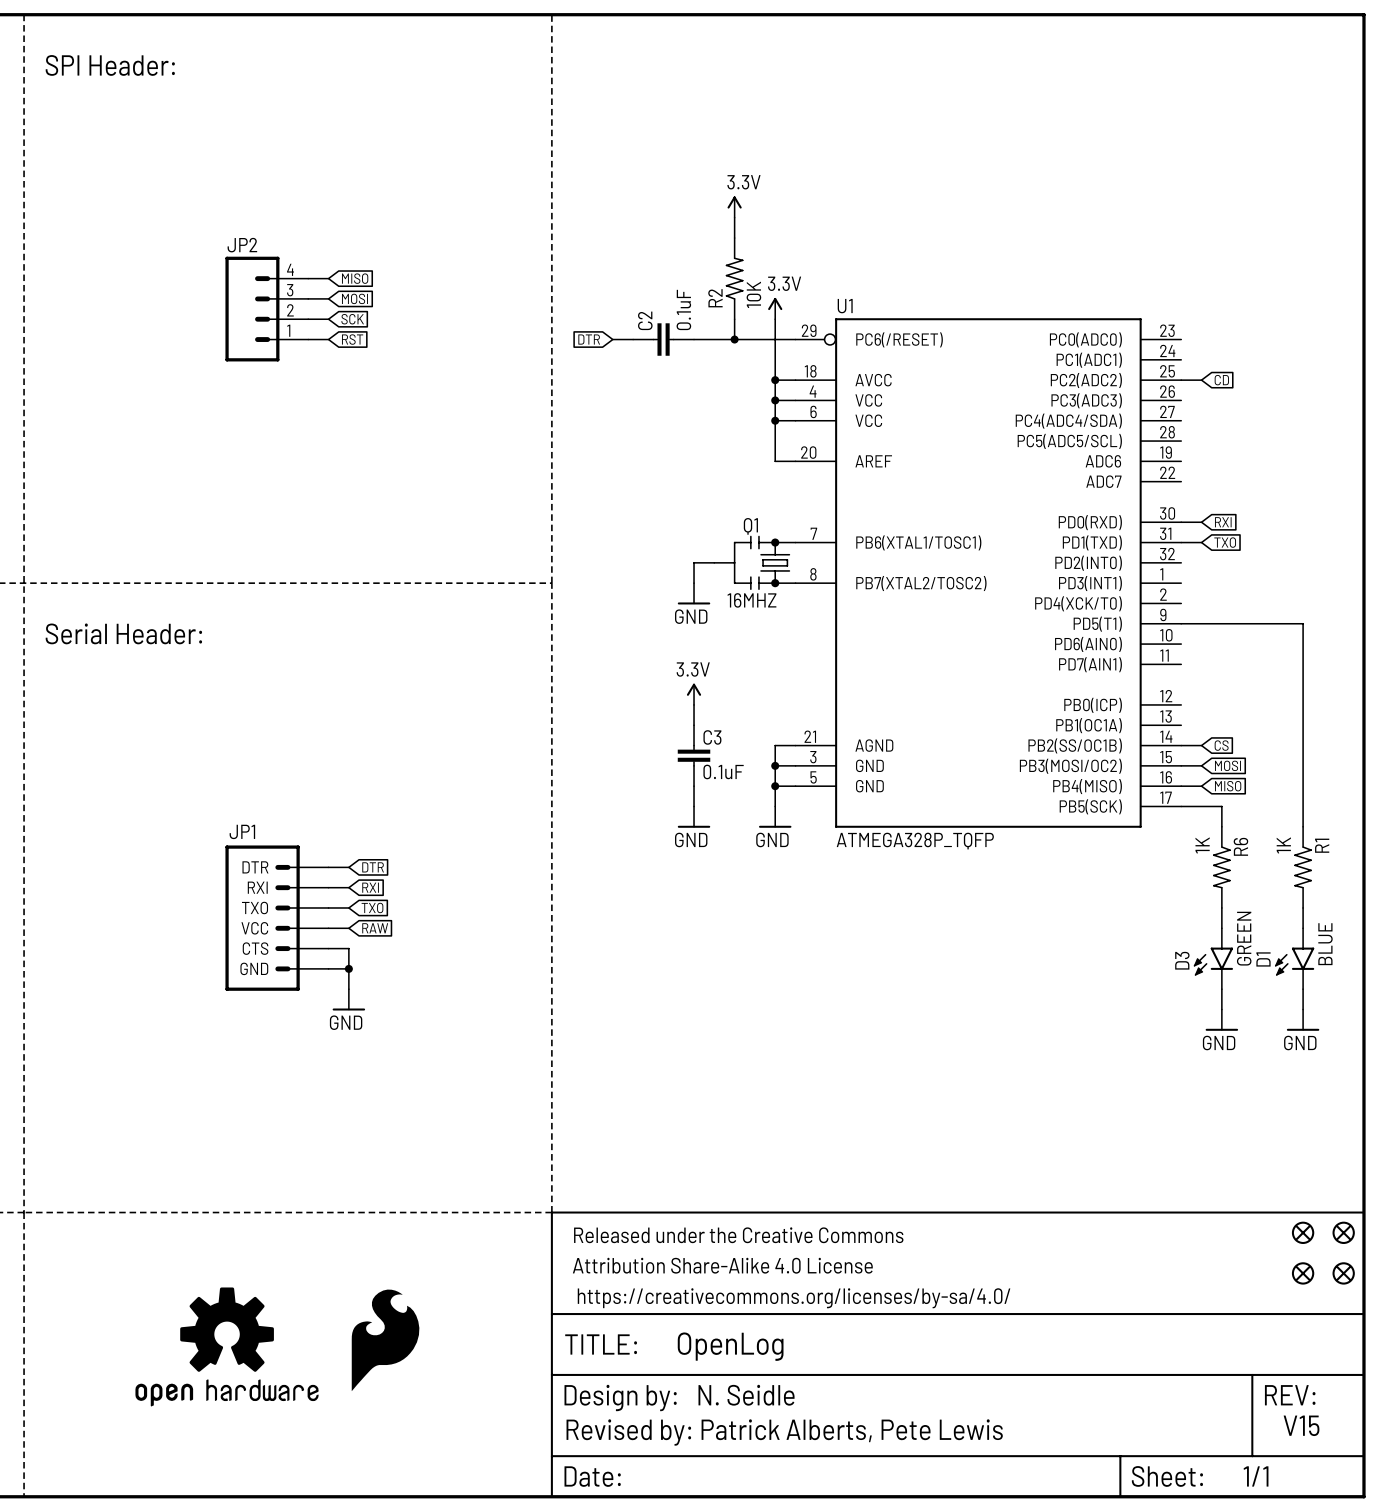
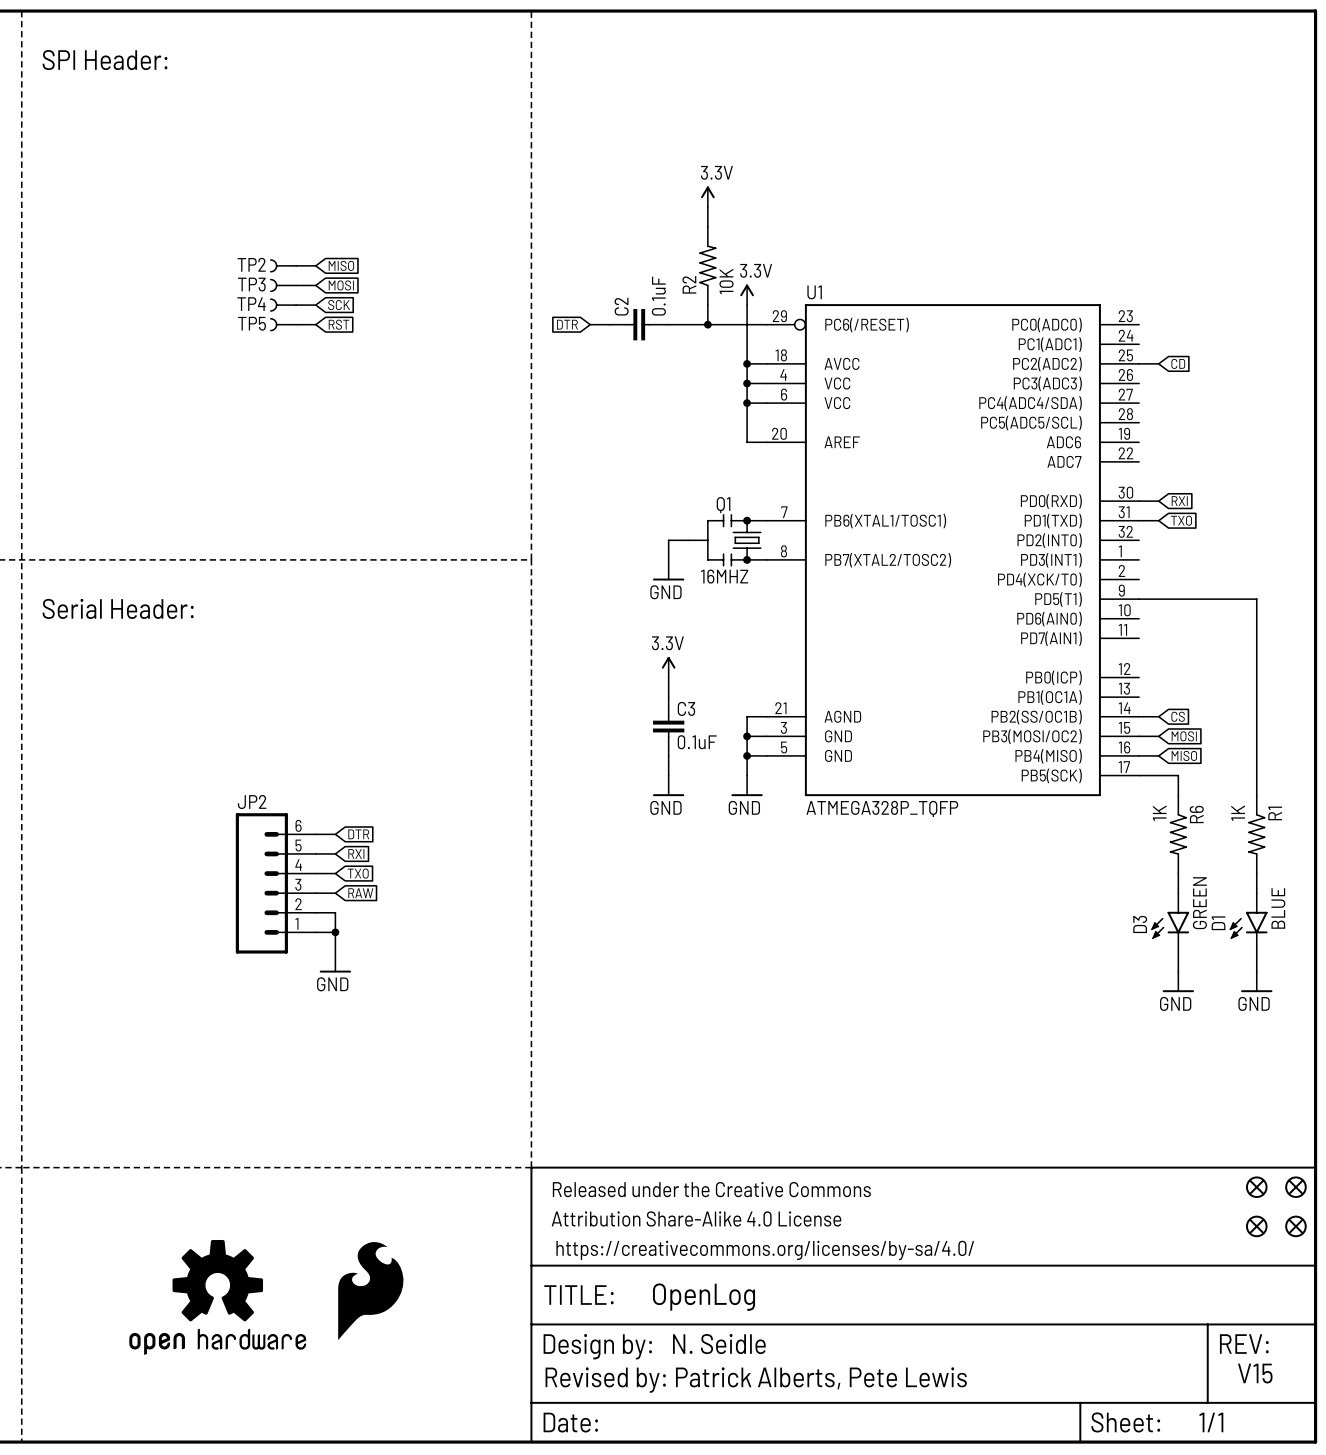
JP2 name position: JP2 (242, 245) -> JP2 (252, 802)
JP2 symbol: [225, 256, 309, 362] -> [235, 813, 316, 954]
TP2: none -> (283, 265)
TP3: none -> (283, 285)
TP4: none -> (283, 305)
TP5: none -> (283, 324)
JP1: (277, 918) -> none

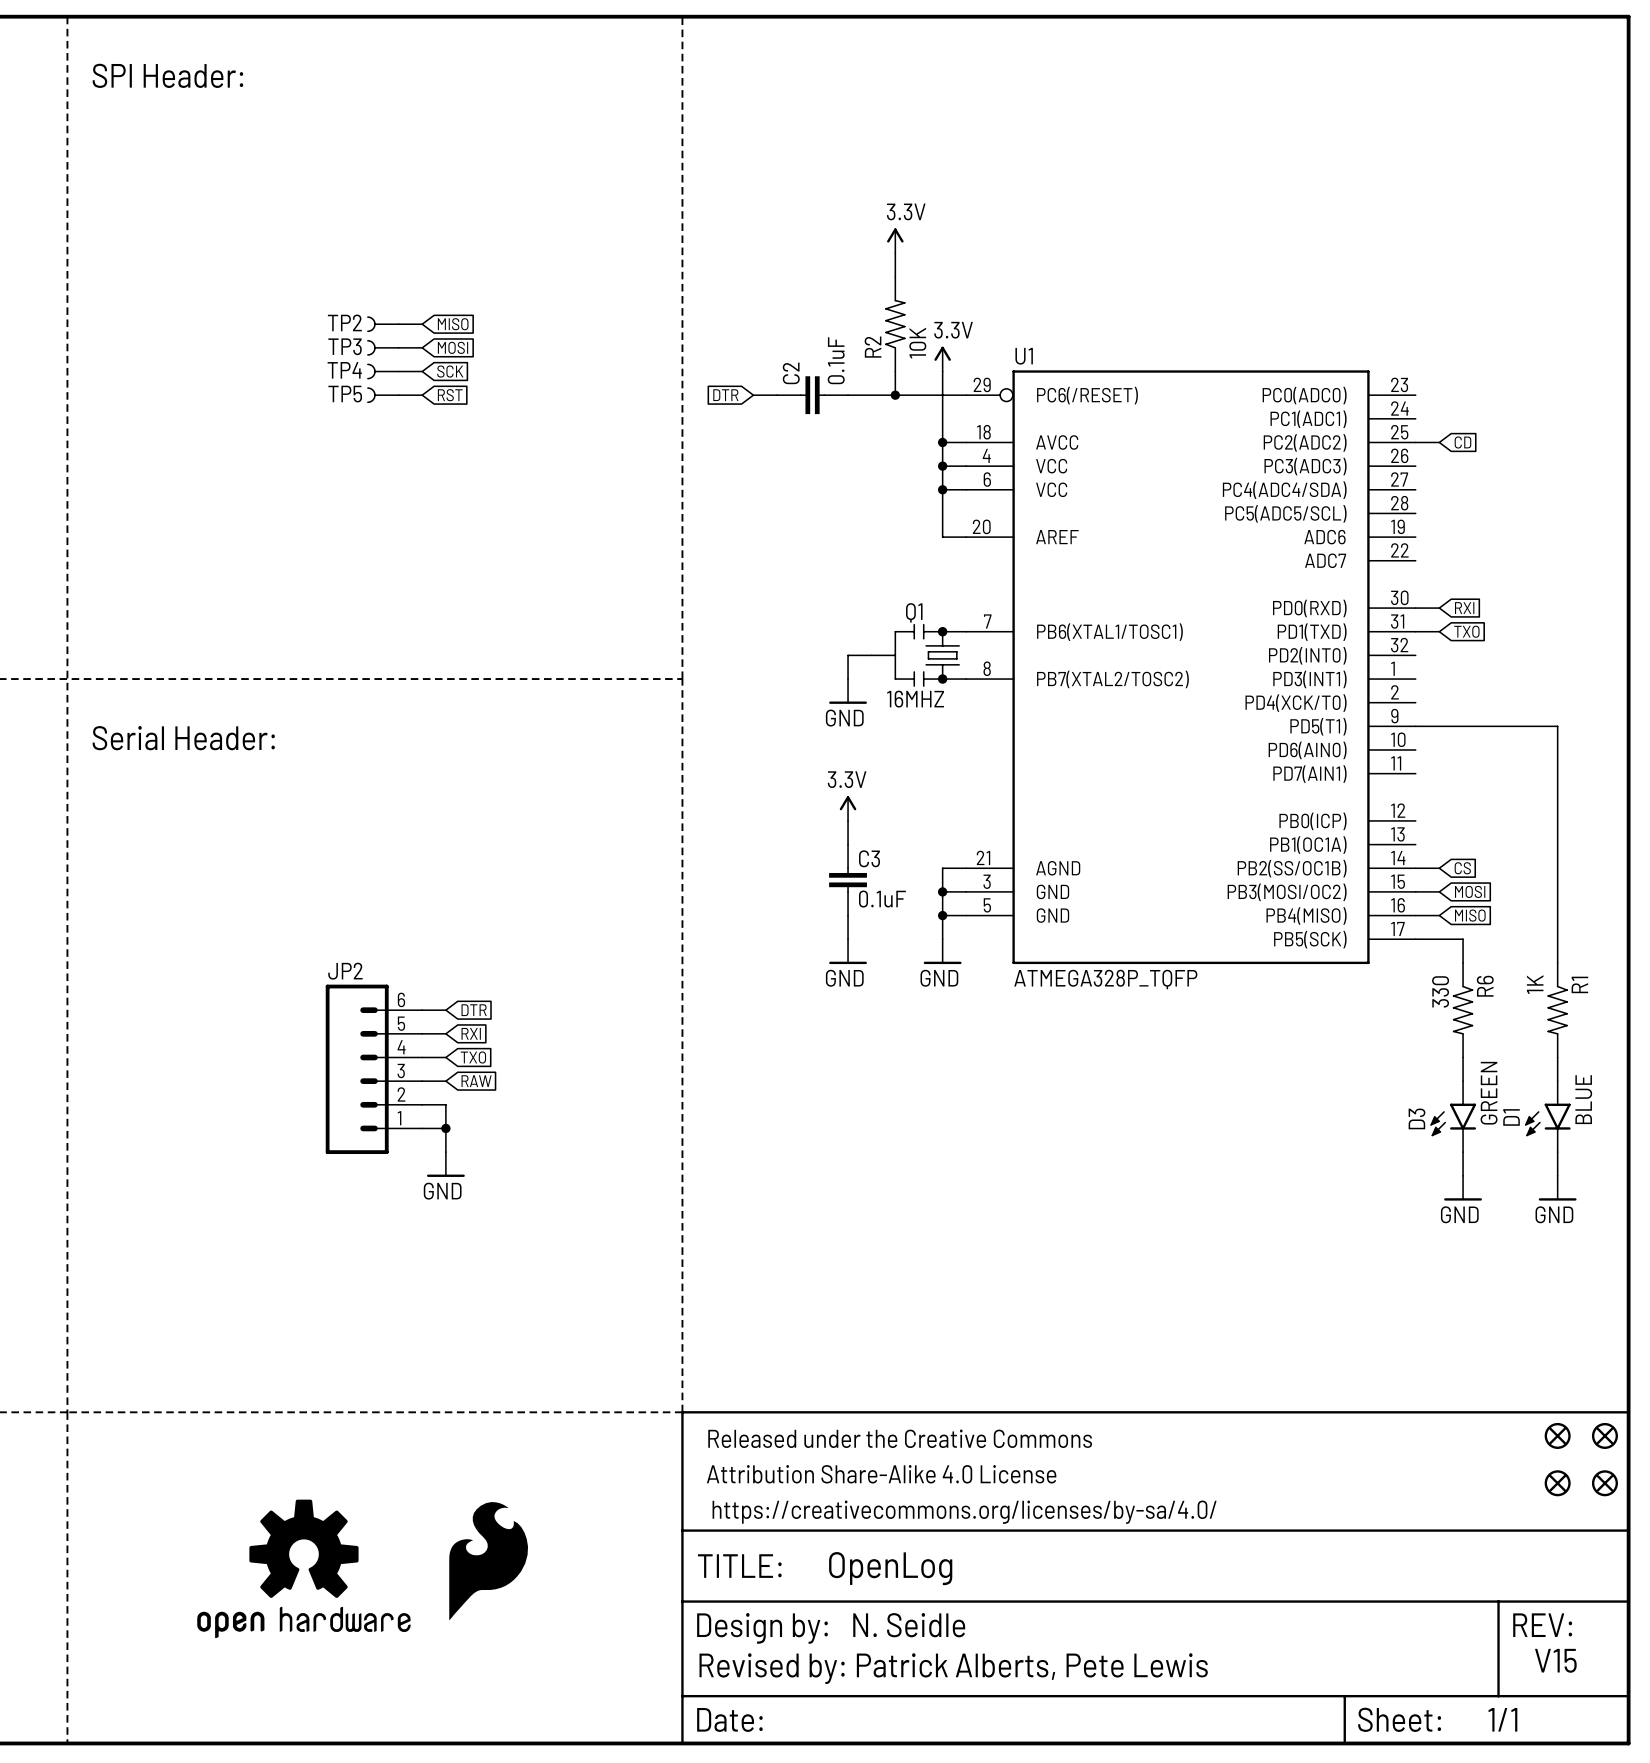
R6 value: 1K (1159, 813) -> 330 (1440, 991)

